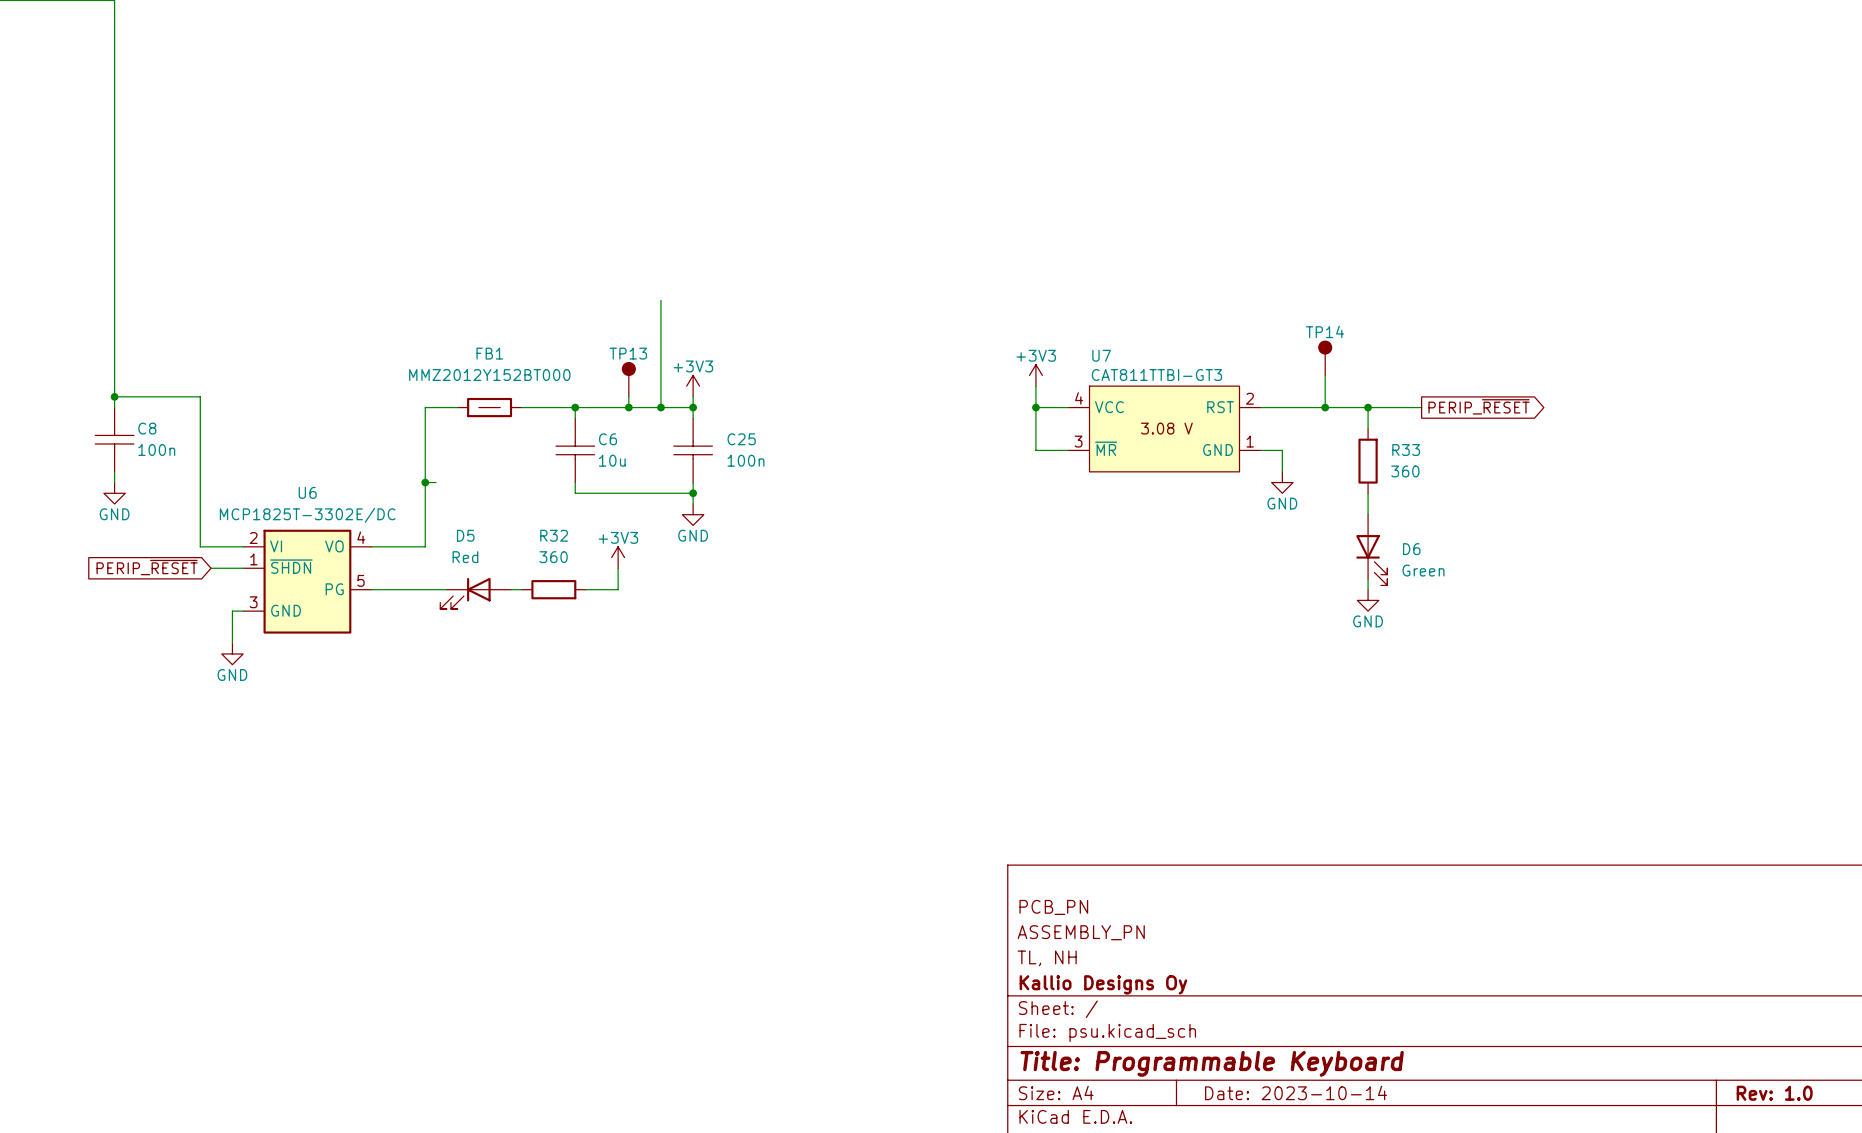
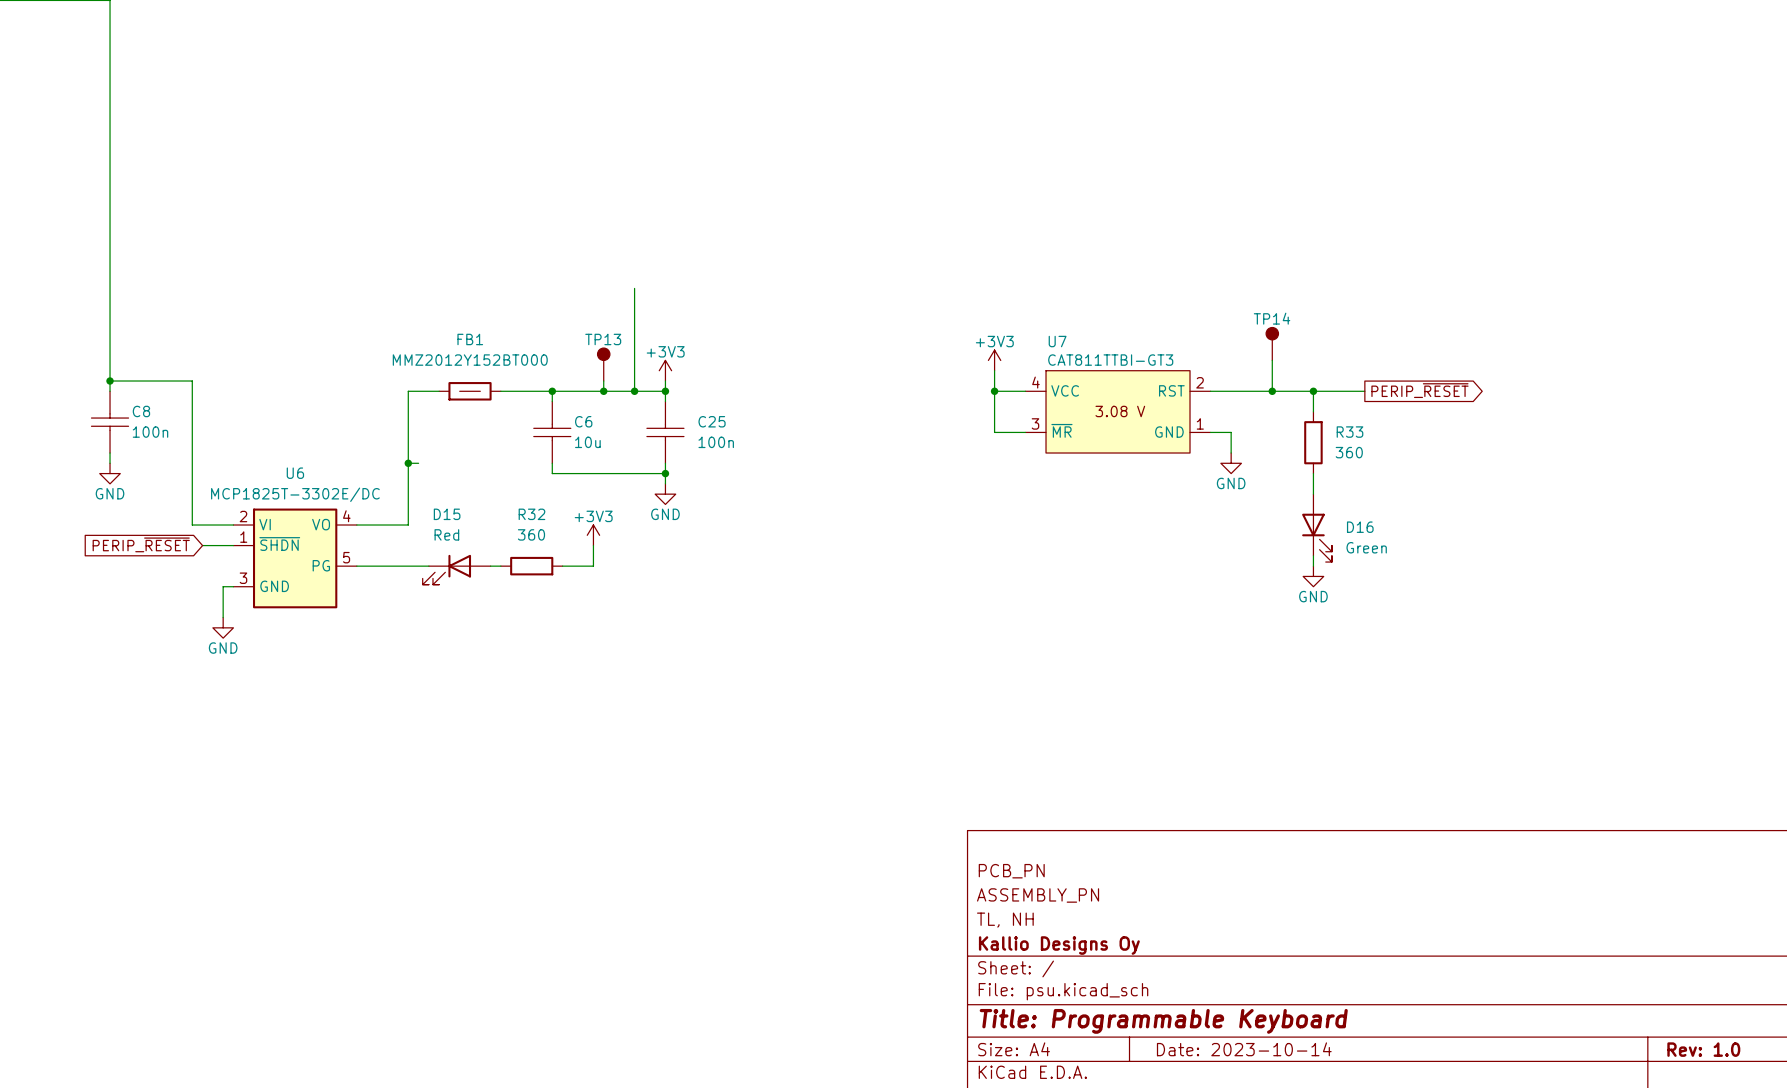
D5 name: D5 (465, 535) -> D15 (447, 514)
D6 name: D6 (1411, 549) -> D16 (1360, 527)

